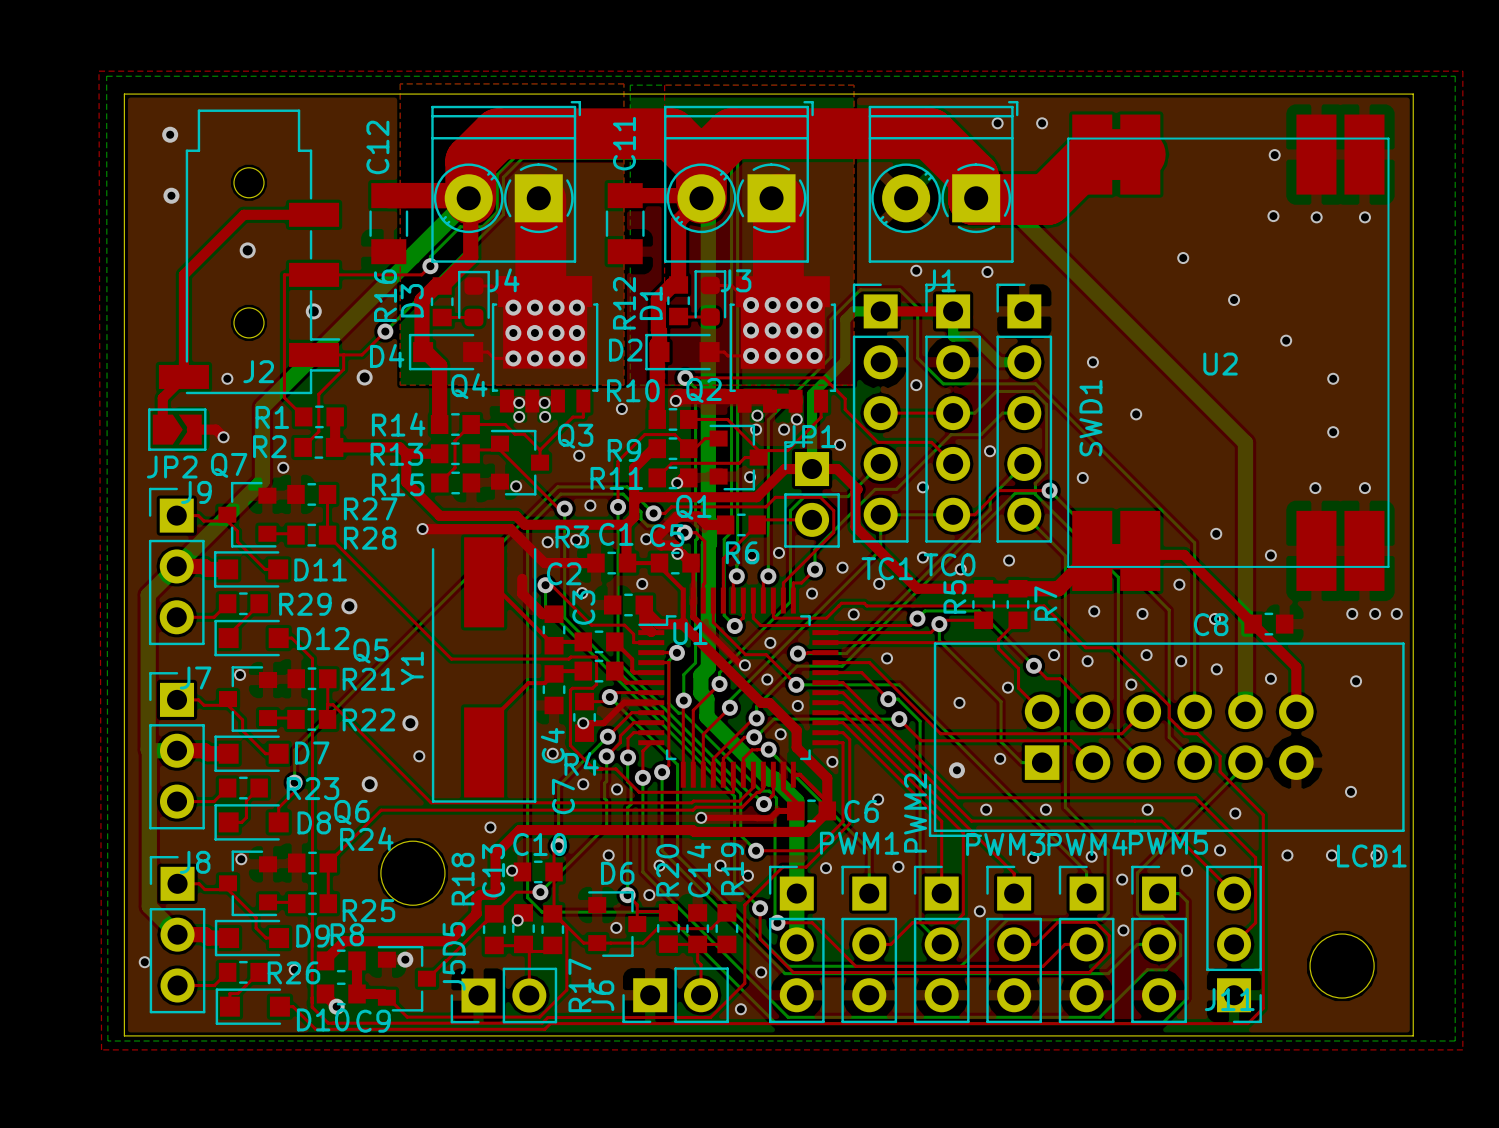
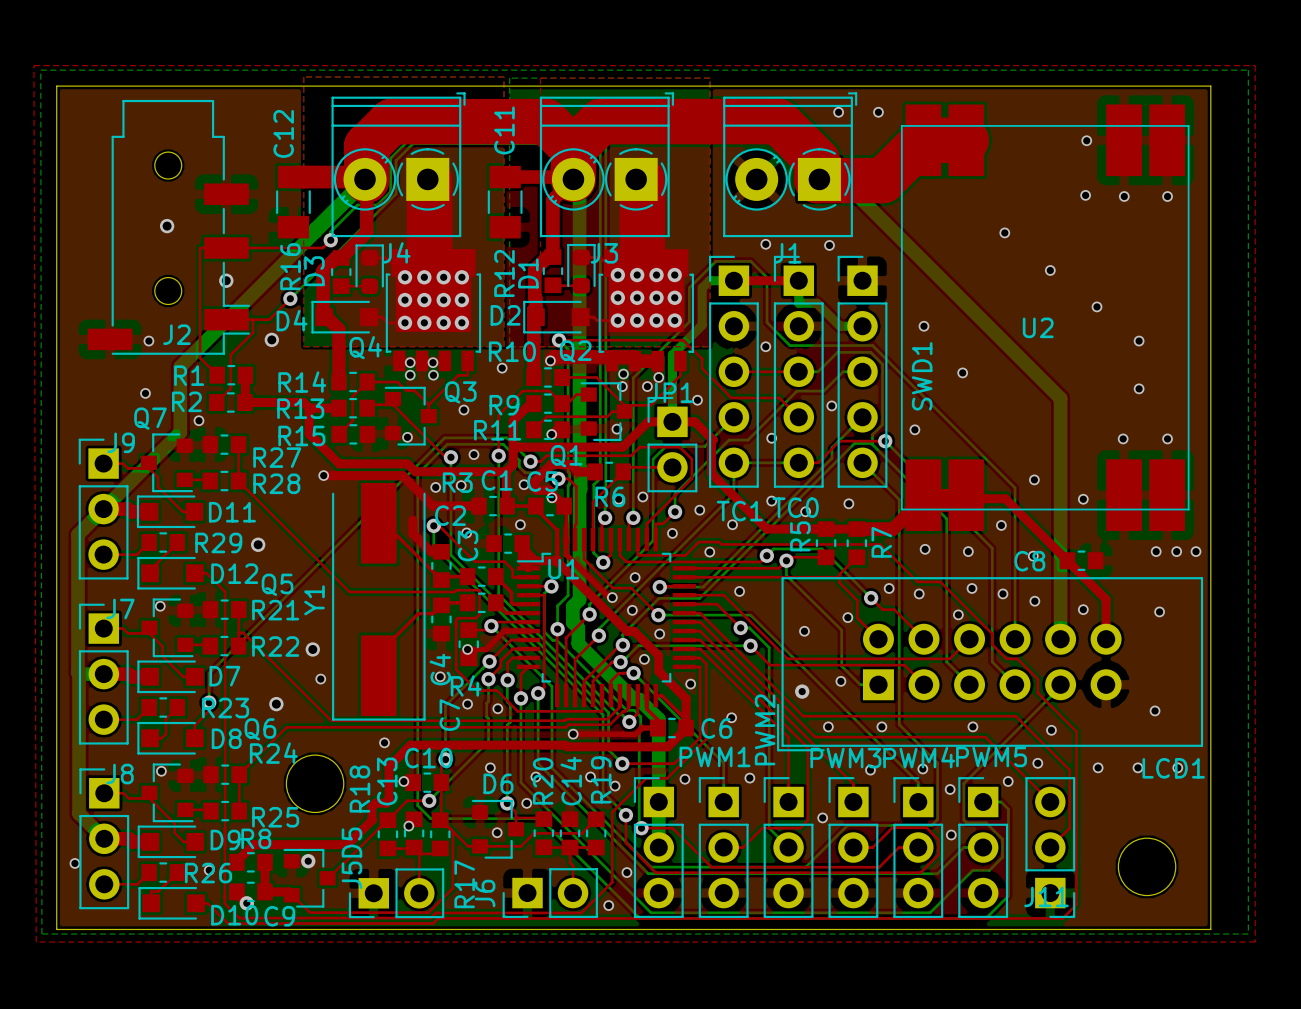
via: (170, 134) -> none
via: (171, 195) -> none
top track: (314, 214) (243, 214) (183, 274) (183, 376) (162, 398) (162, 429) -> none
JP2: (177, 429) -> none
top track: (191, 429) (215, 429) (223, 437) -> none

